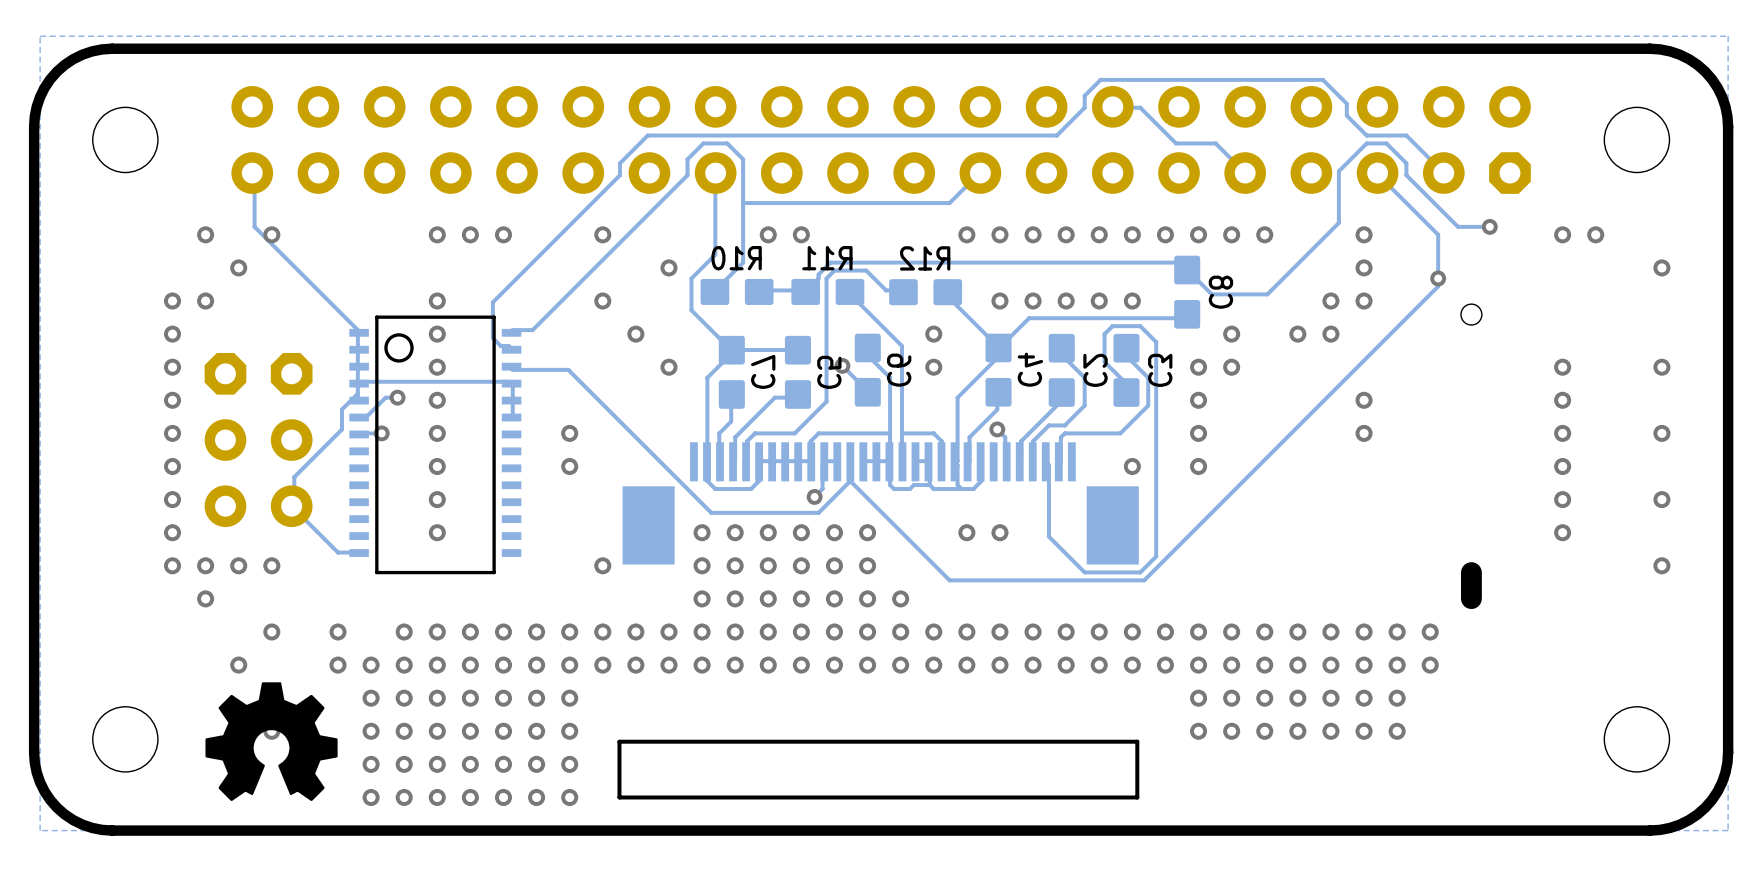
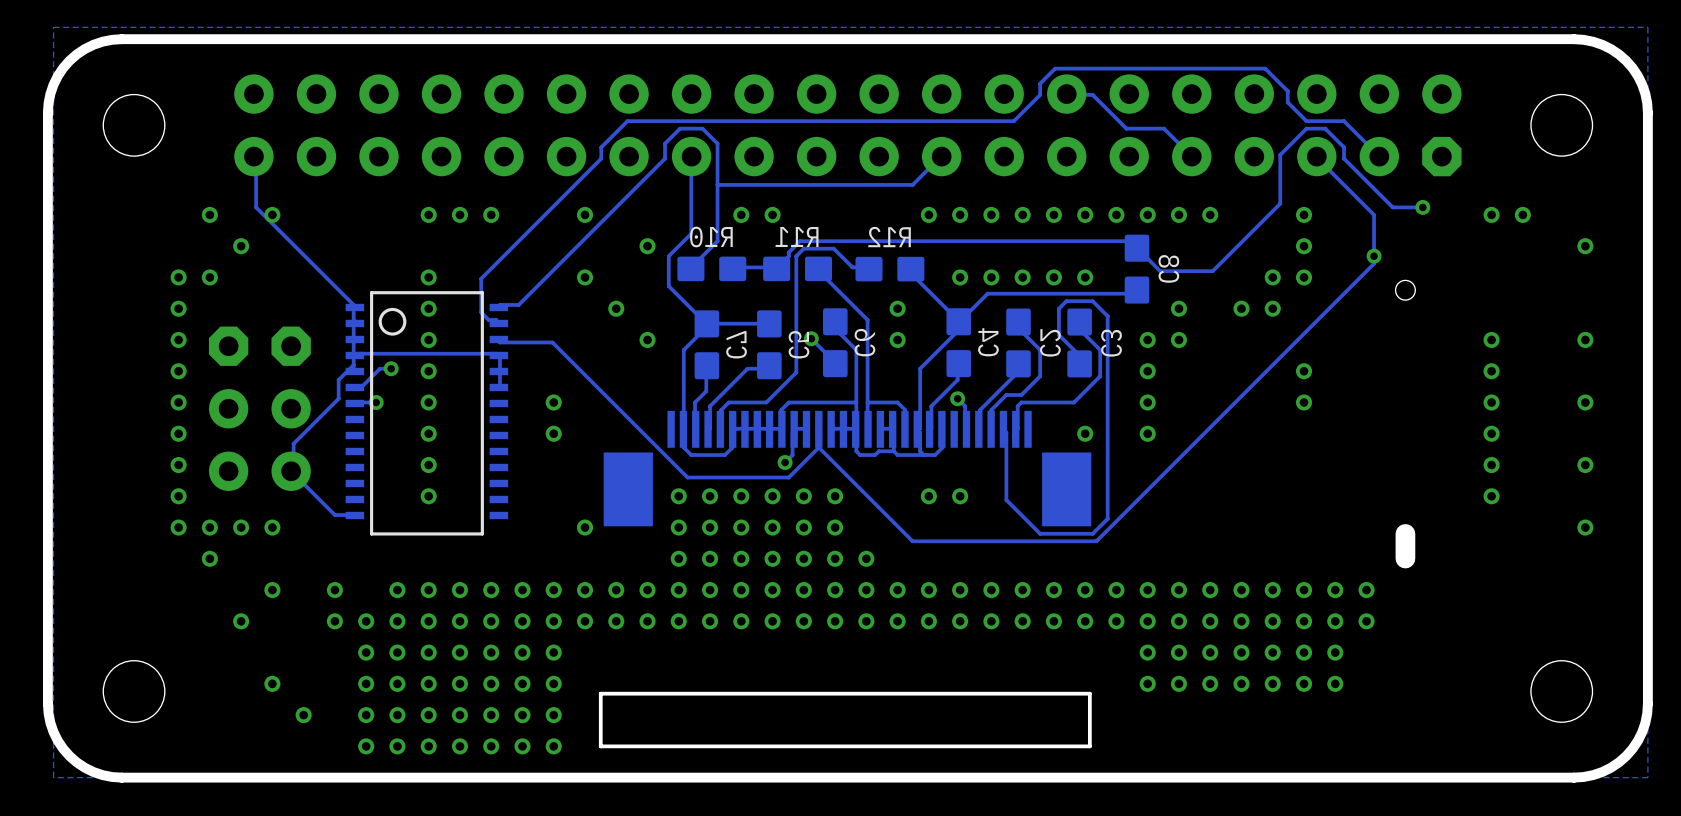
drawing: [205, 682, 338, 801] -> none

